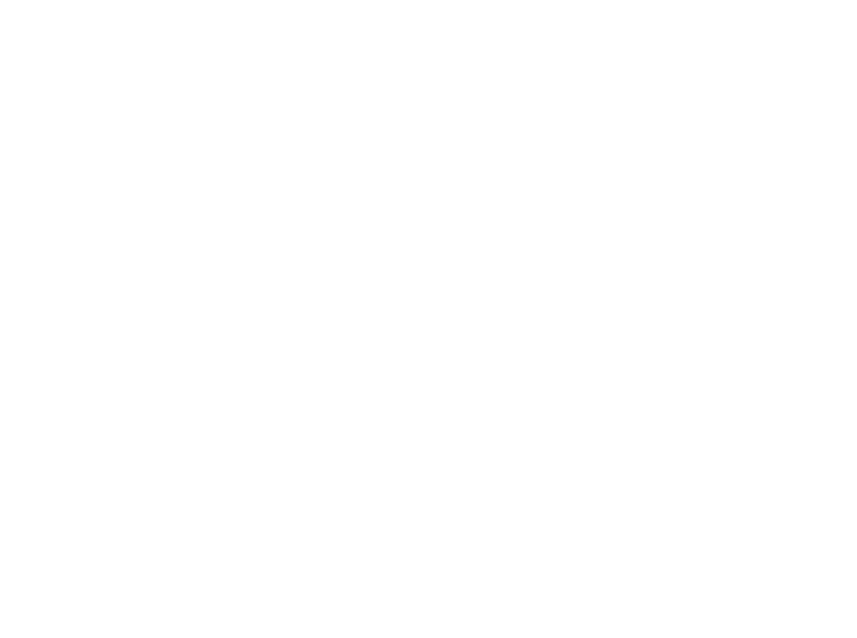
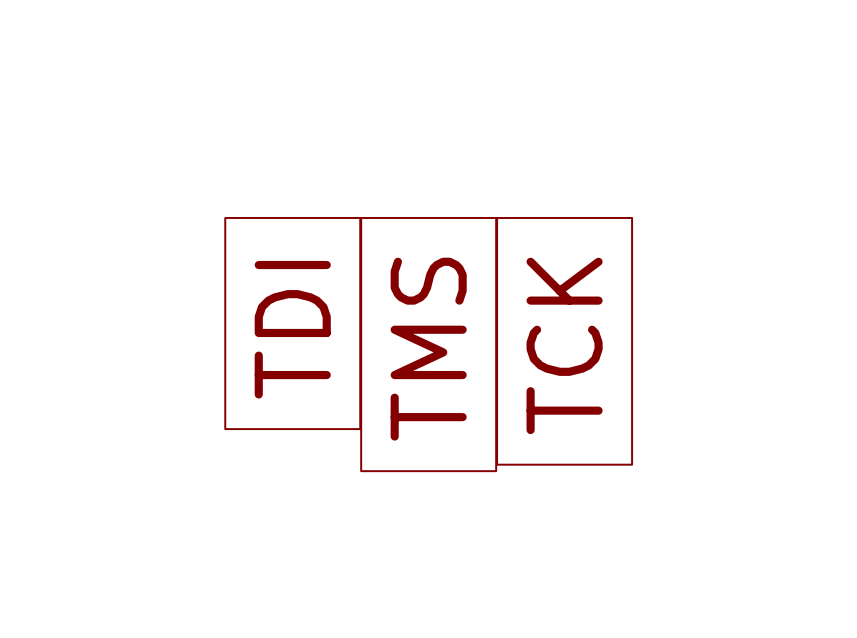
global label: none -> TDI (292, 329)
global label: none -> TCK (564, 345)
global label: none -> TMS (428, 349)

